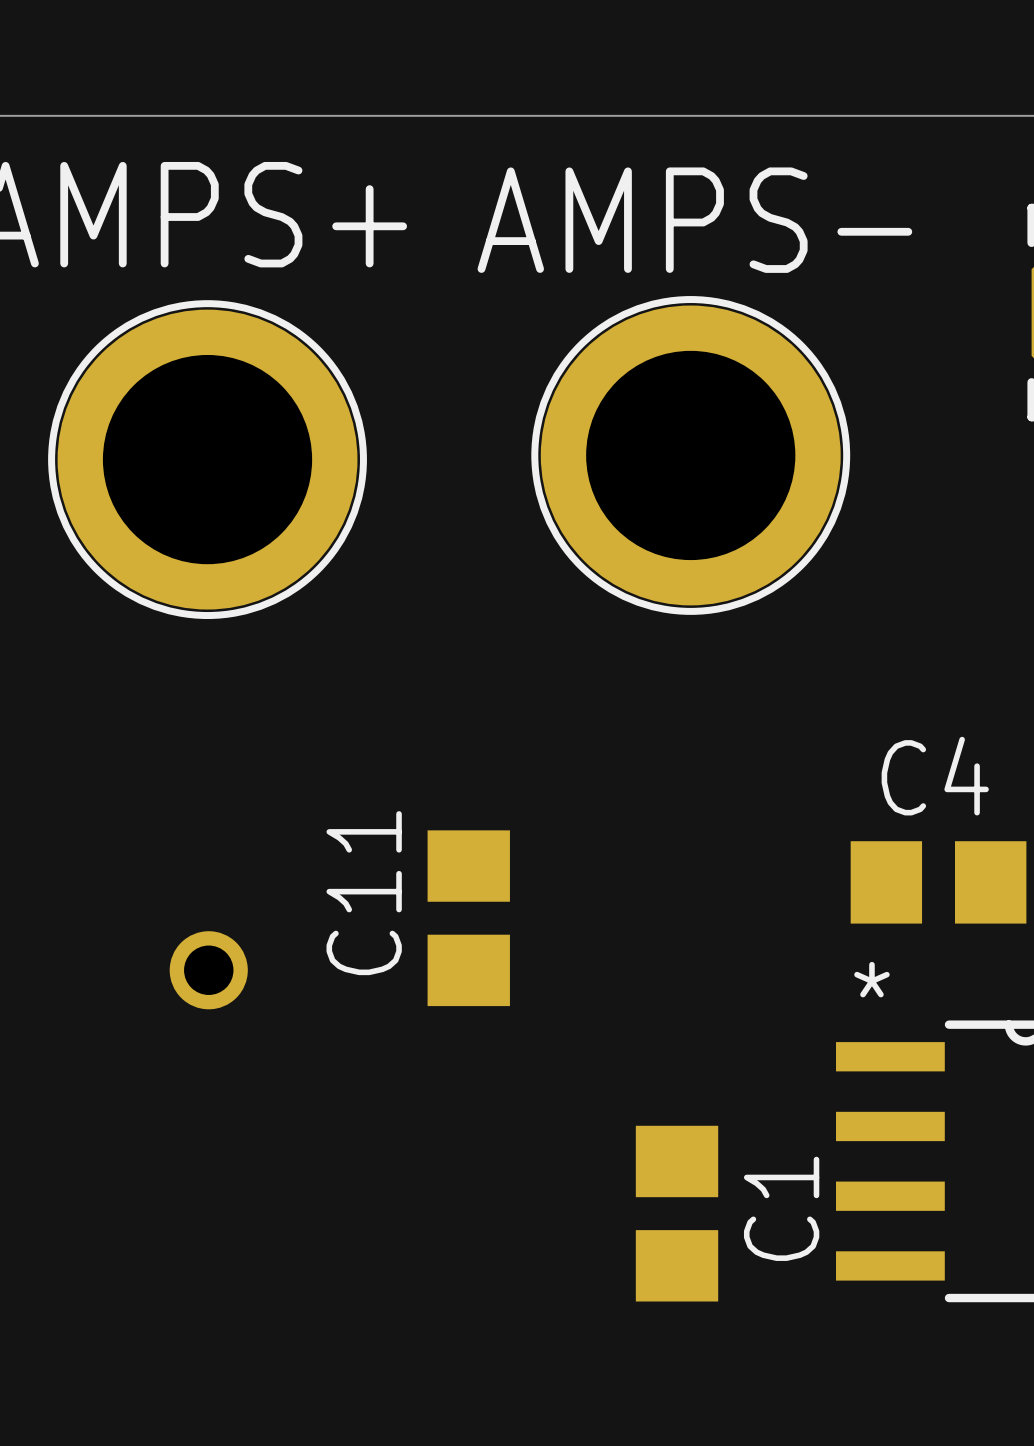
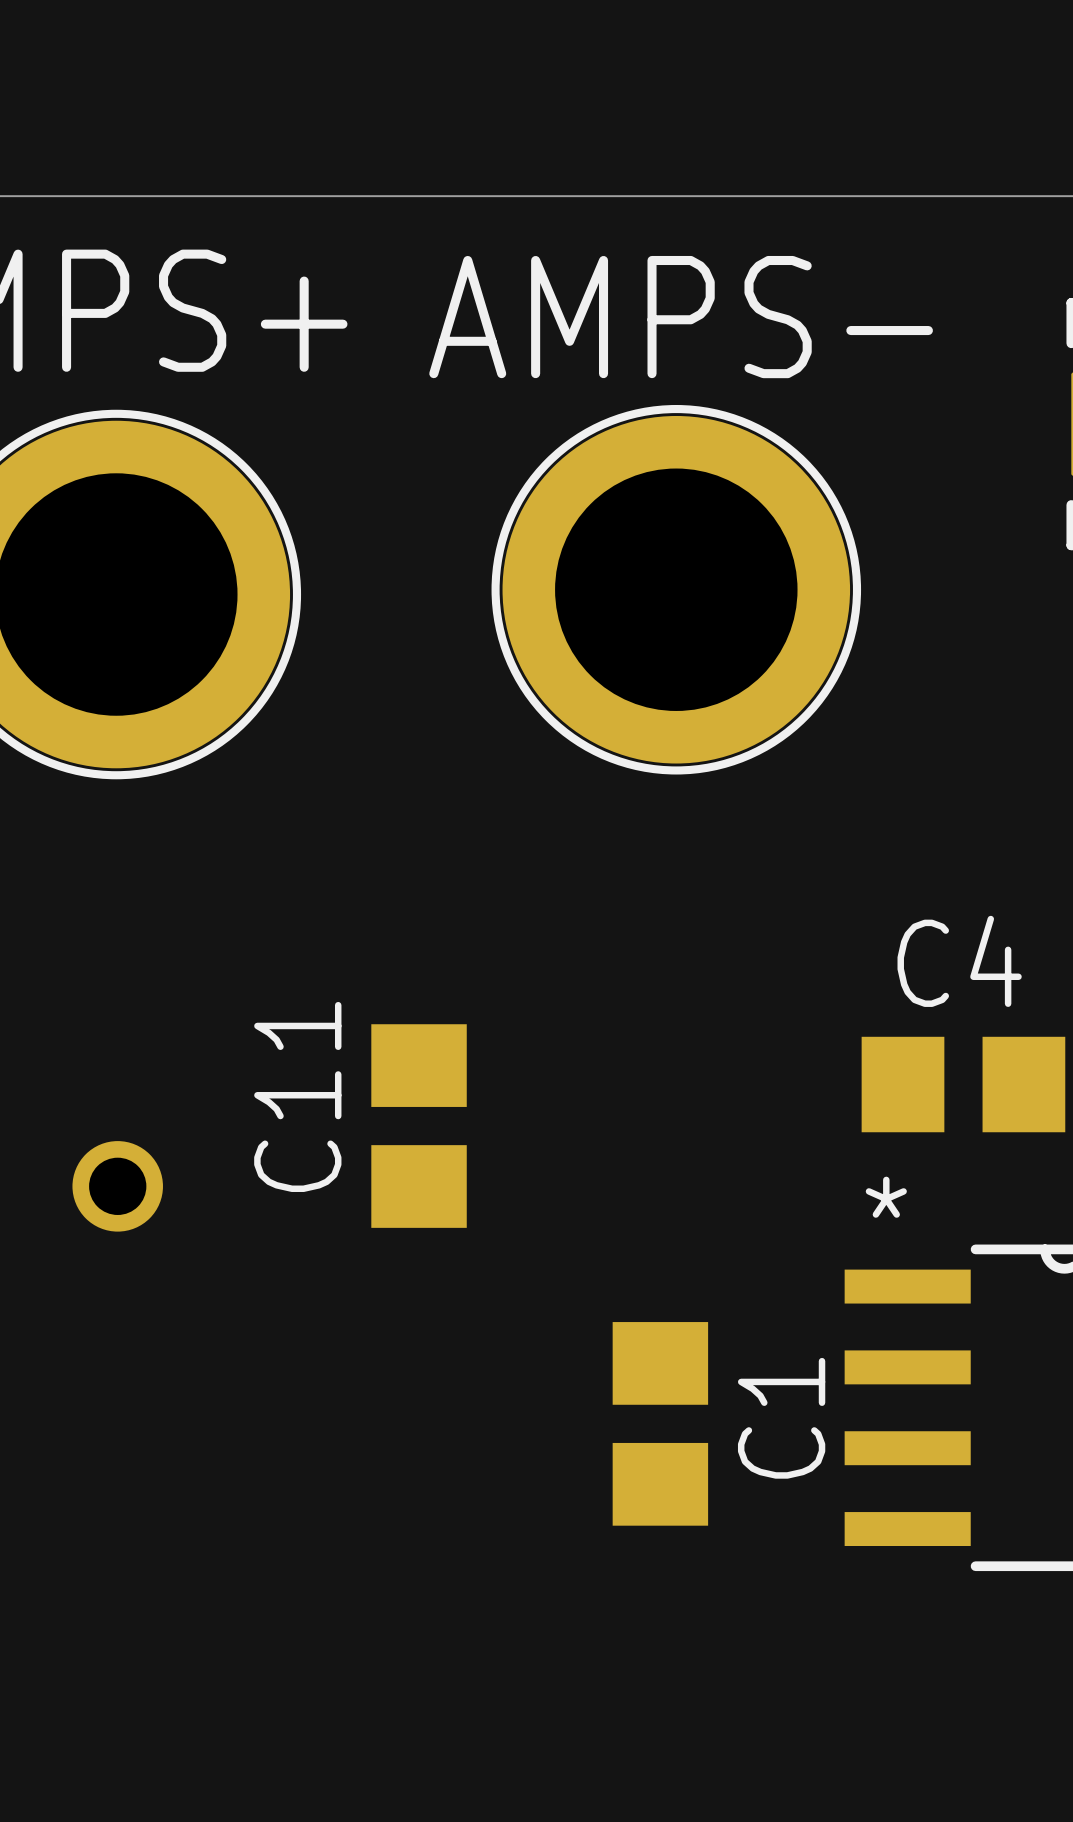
C1 position: (677, 1213) -> (660, 1423)

